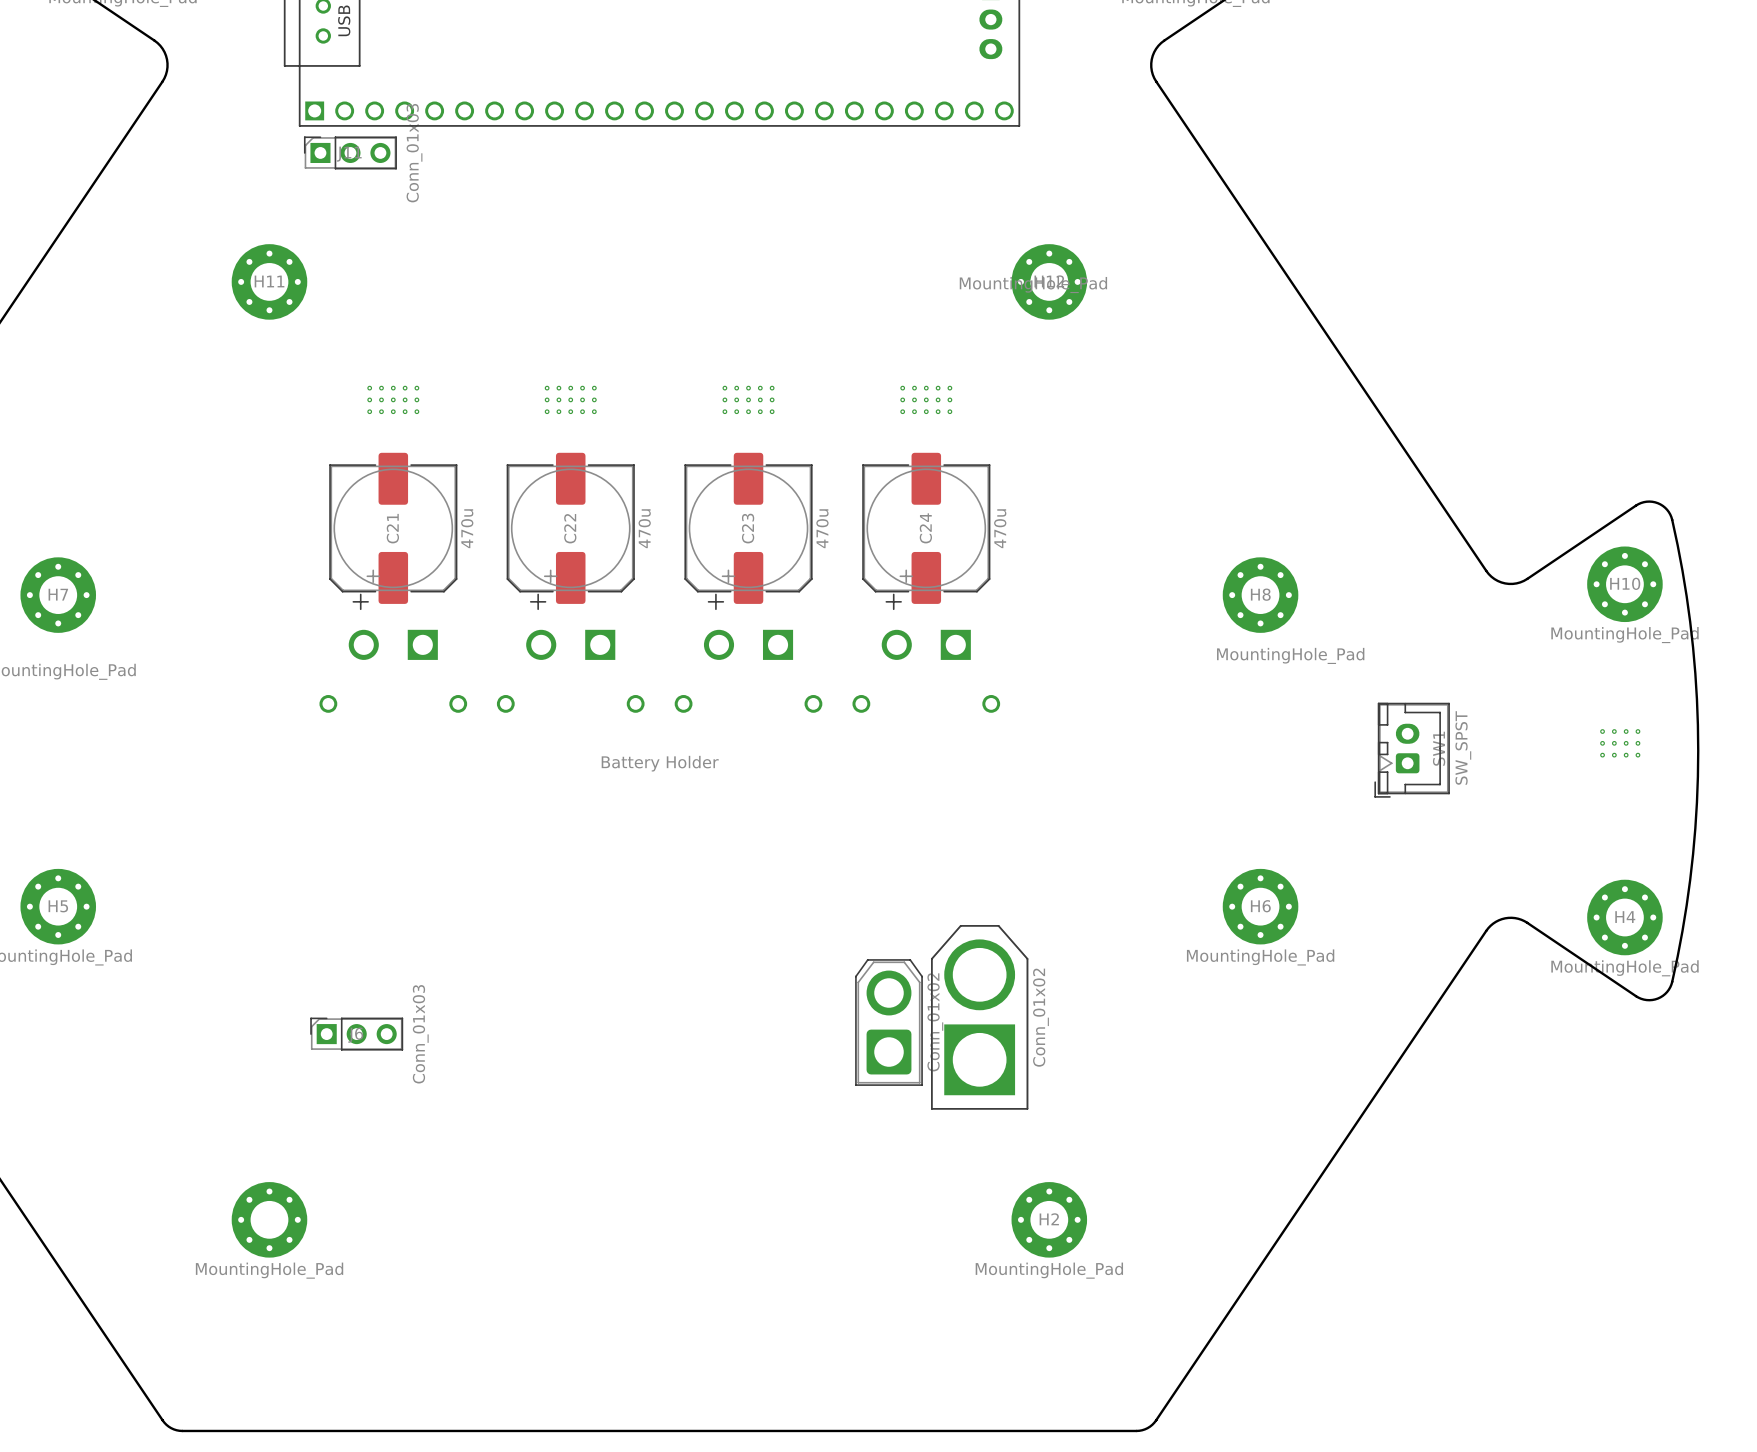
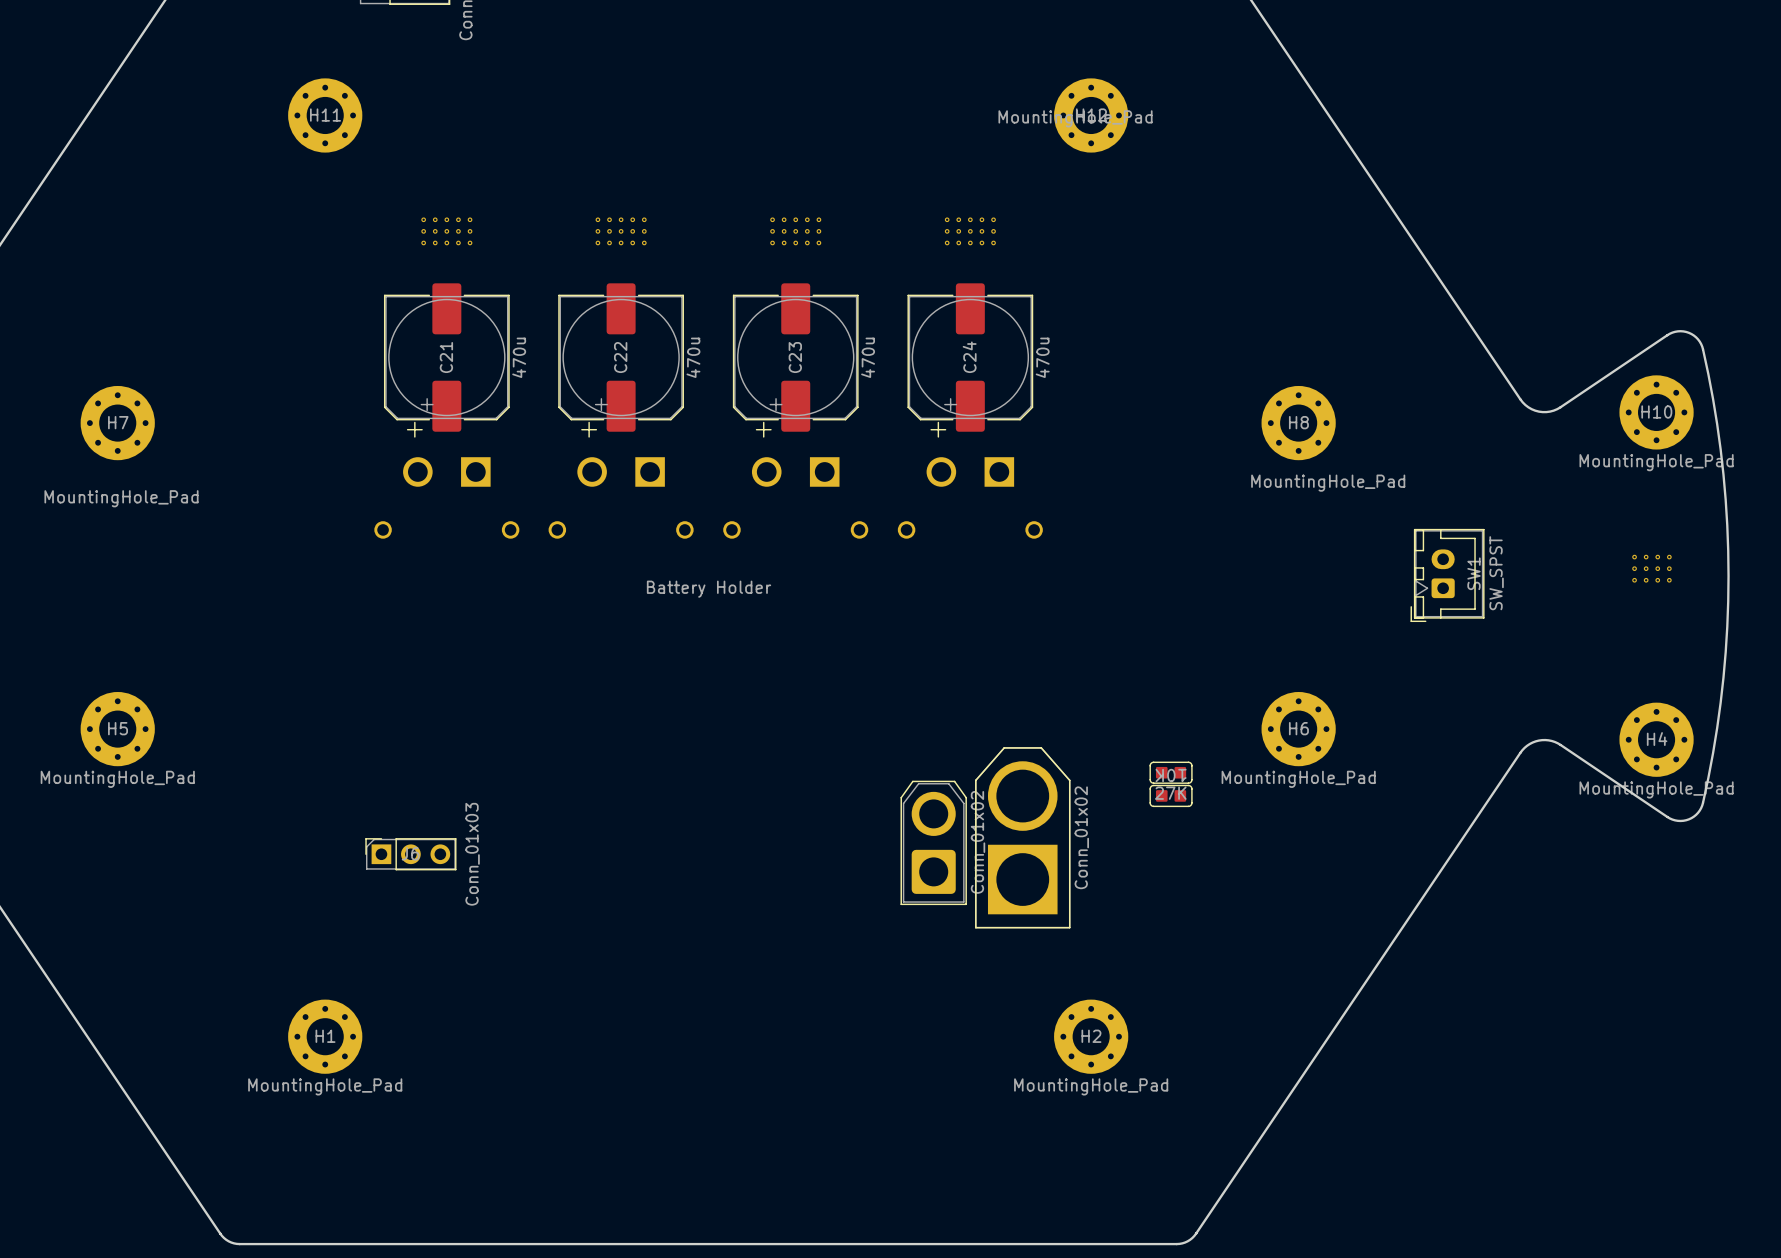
part: none -> 27K (1171, 772)
part: none -> 10K (1171, 795)
H1 name: none -> H1 (325, 1036)

